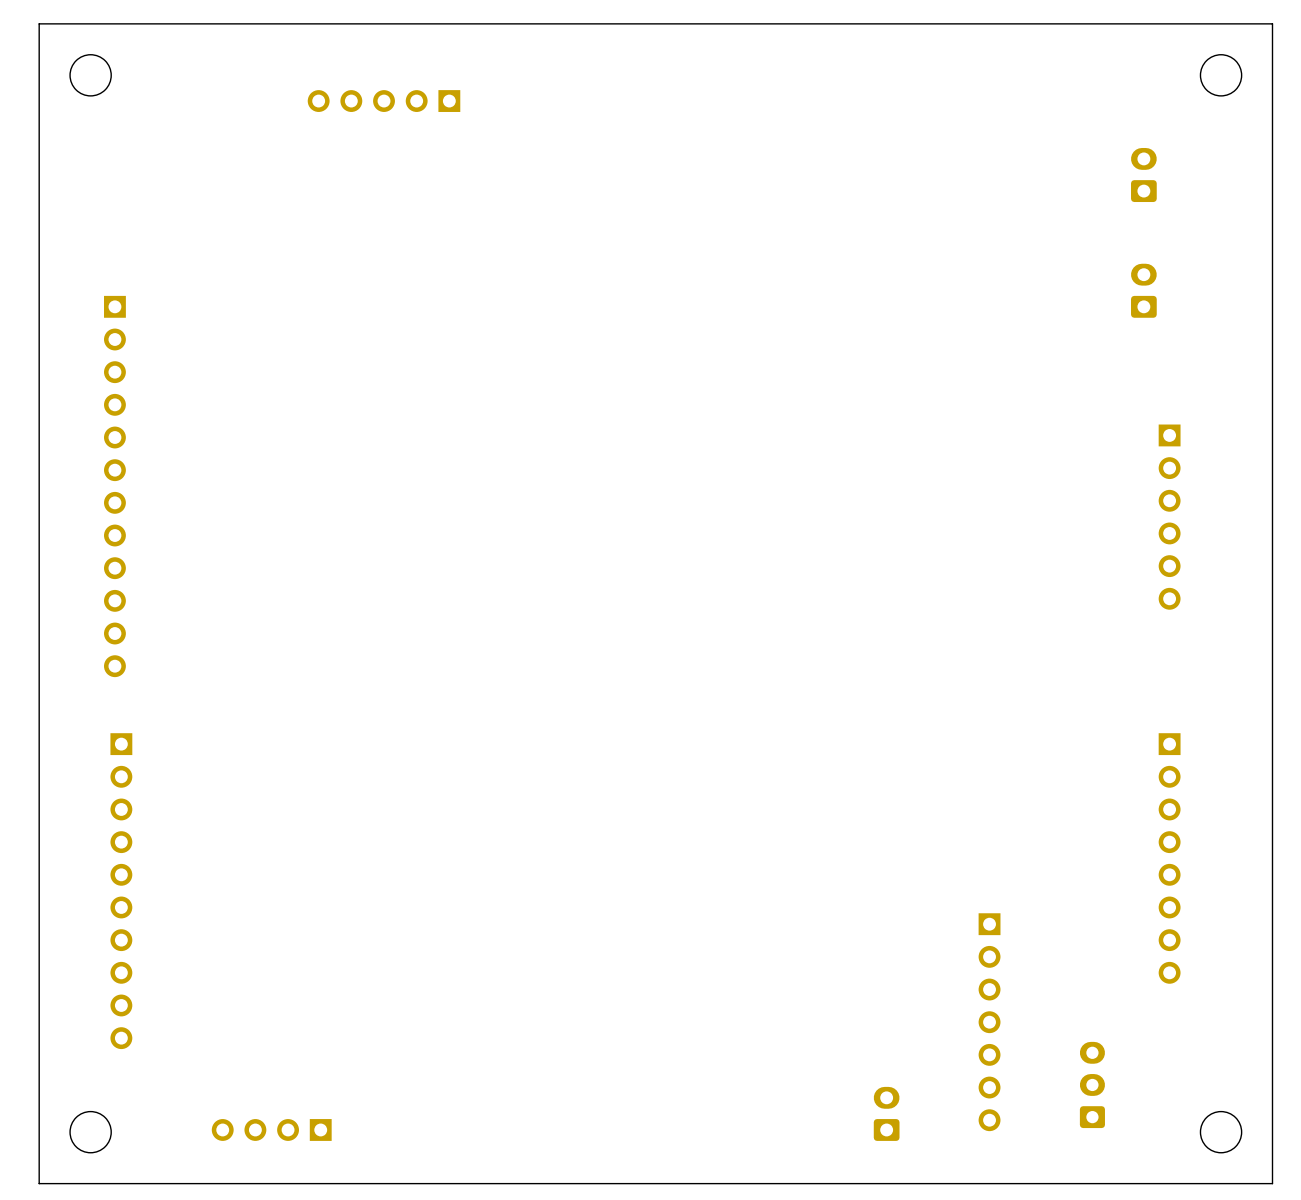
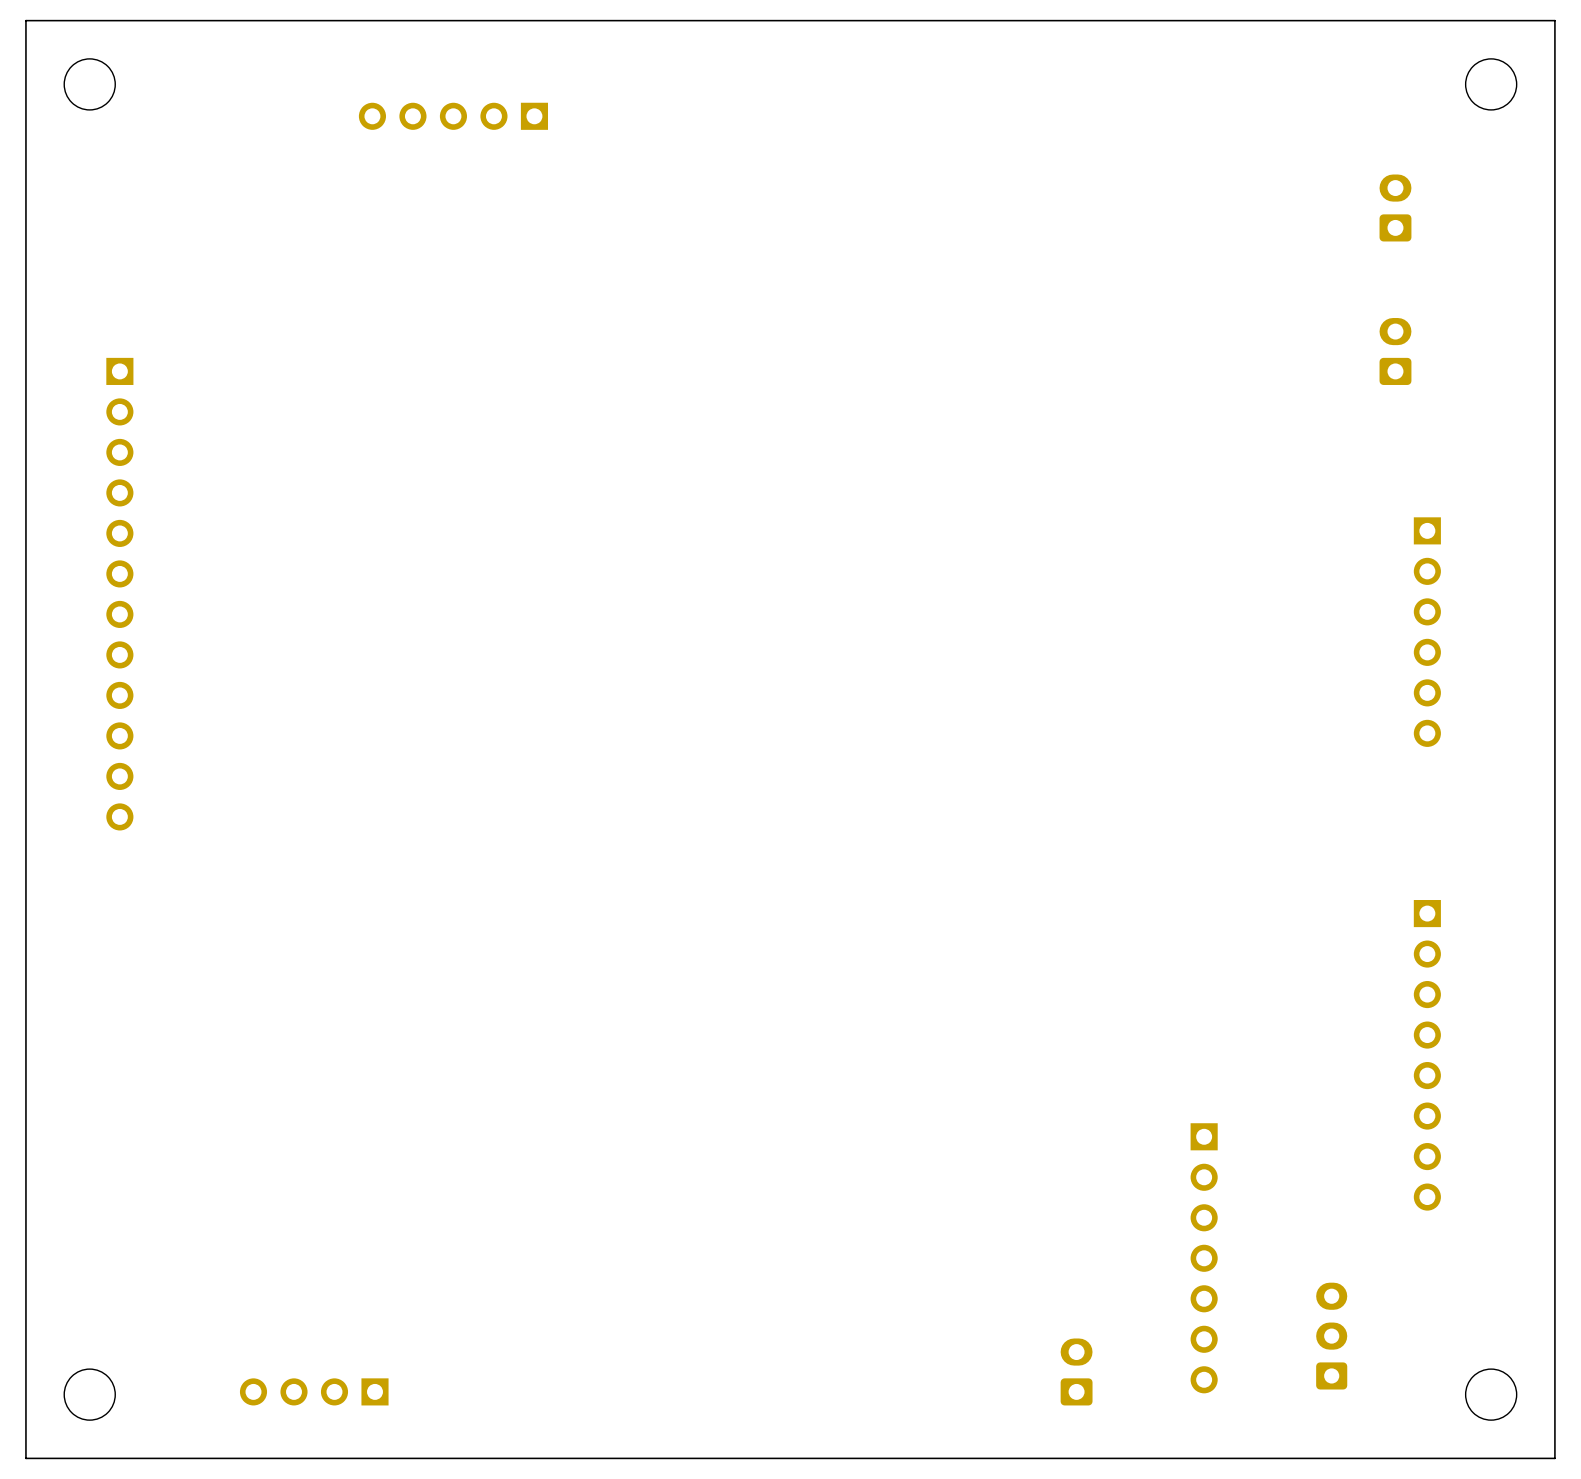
part: (121, 891) -> none

